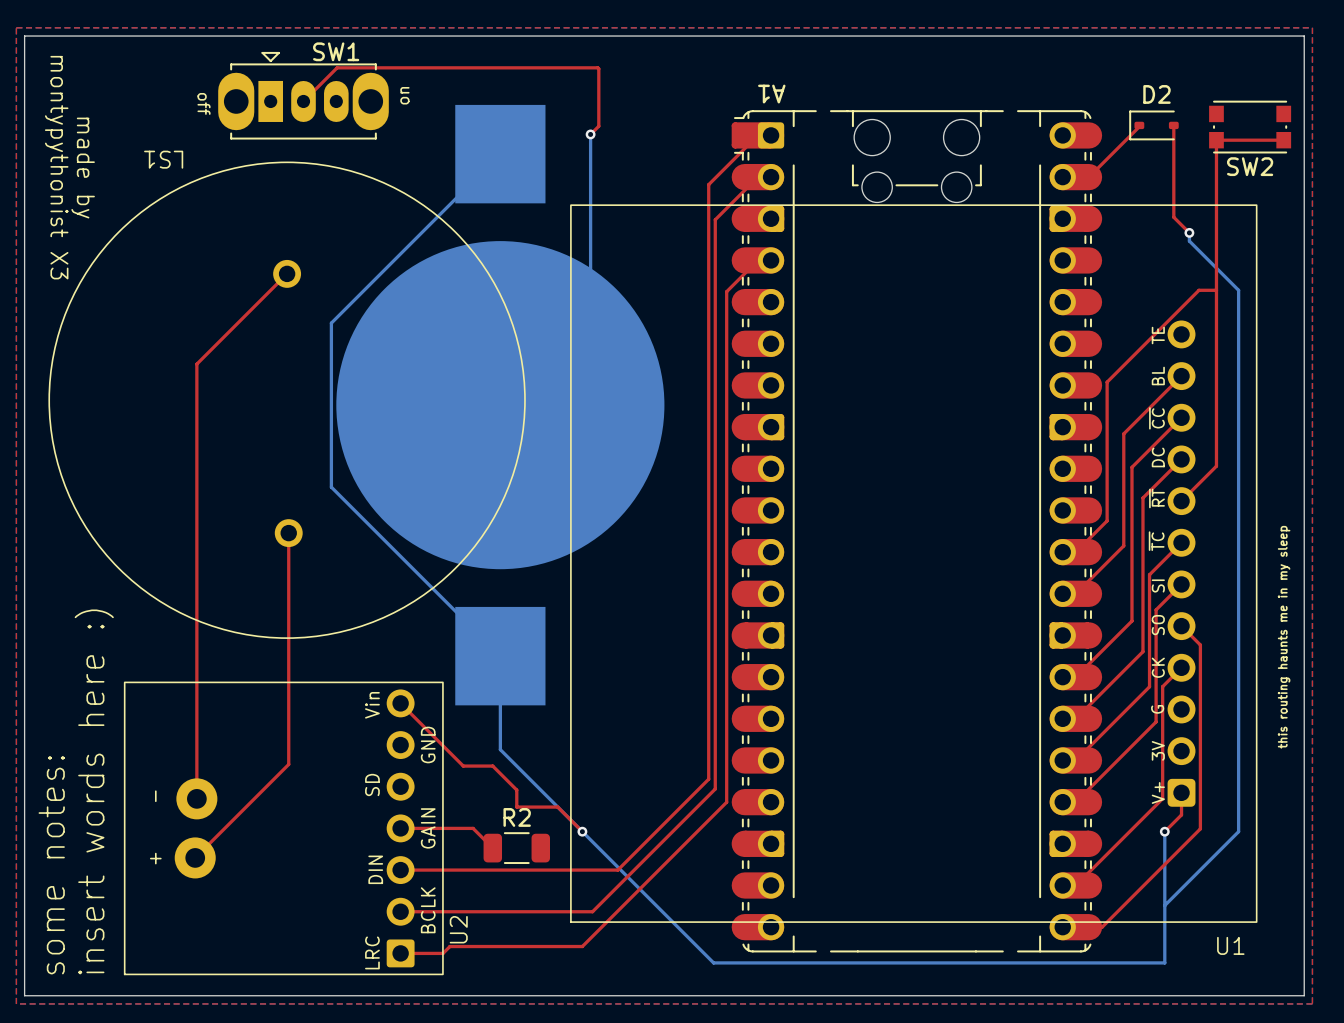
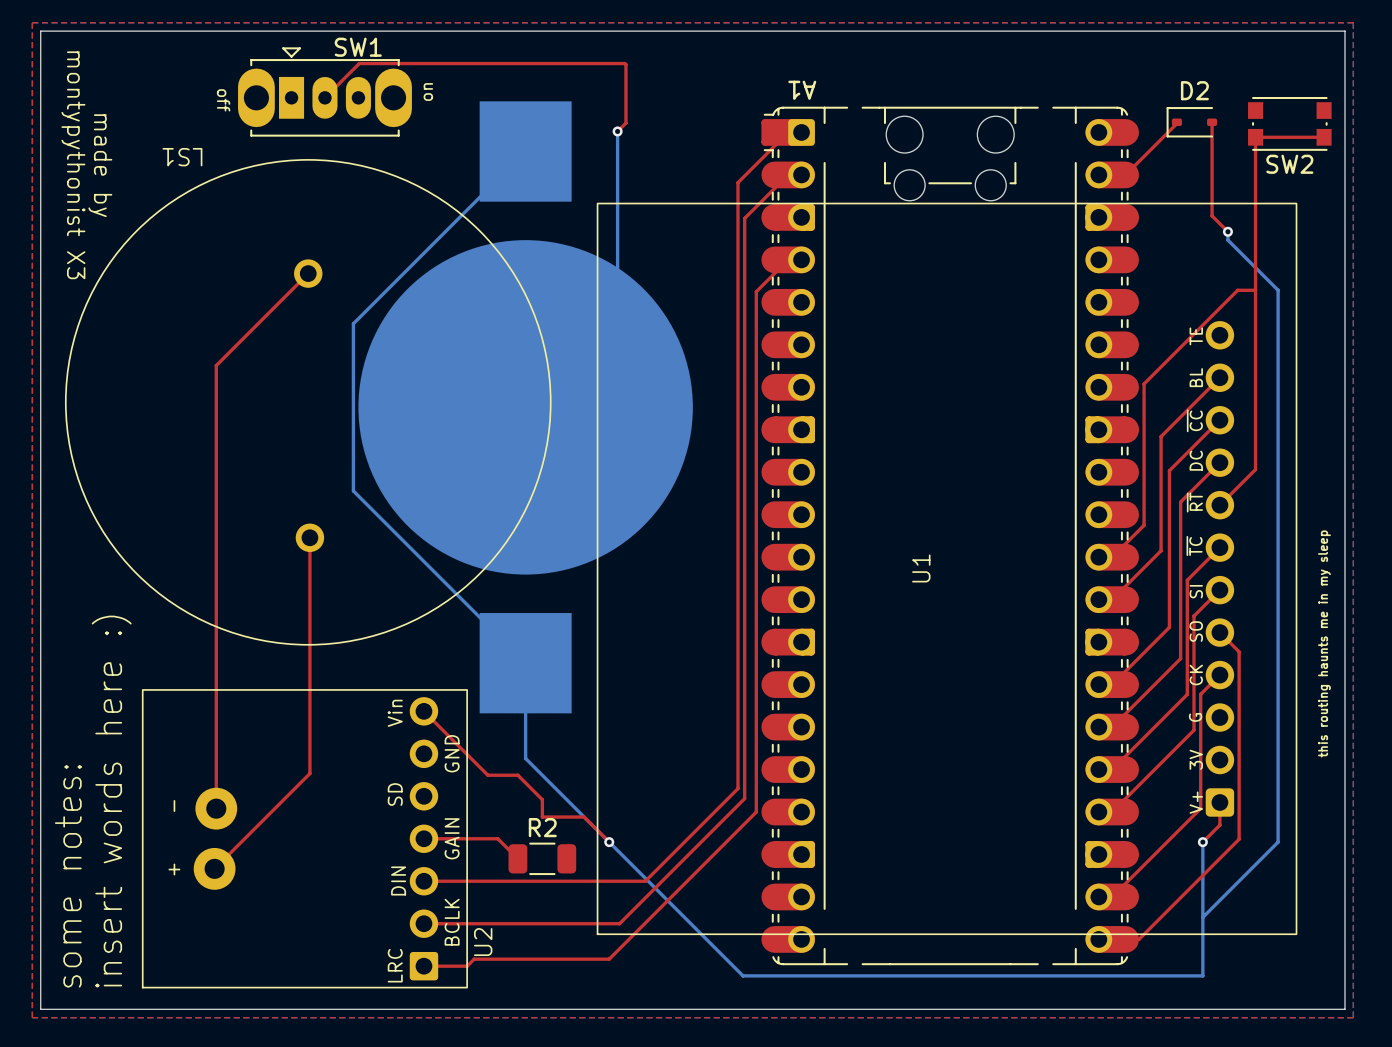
U1 name rotation: 0° (1230, 945) -> 90° counterclockwise (921, 568)
U1 name position: U1 (1230, 945) -> U1 (921, 568)

